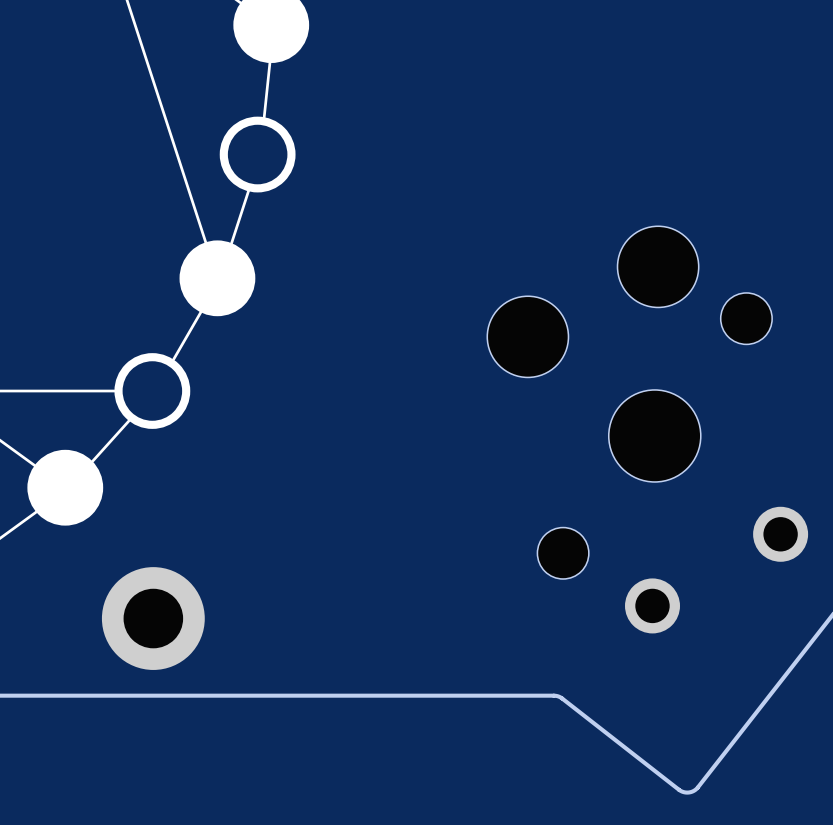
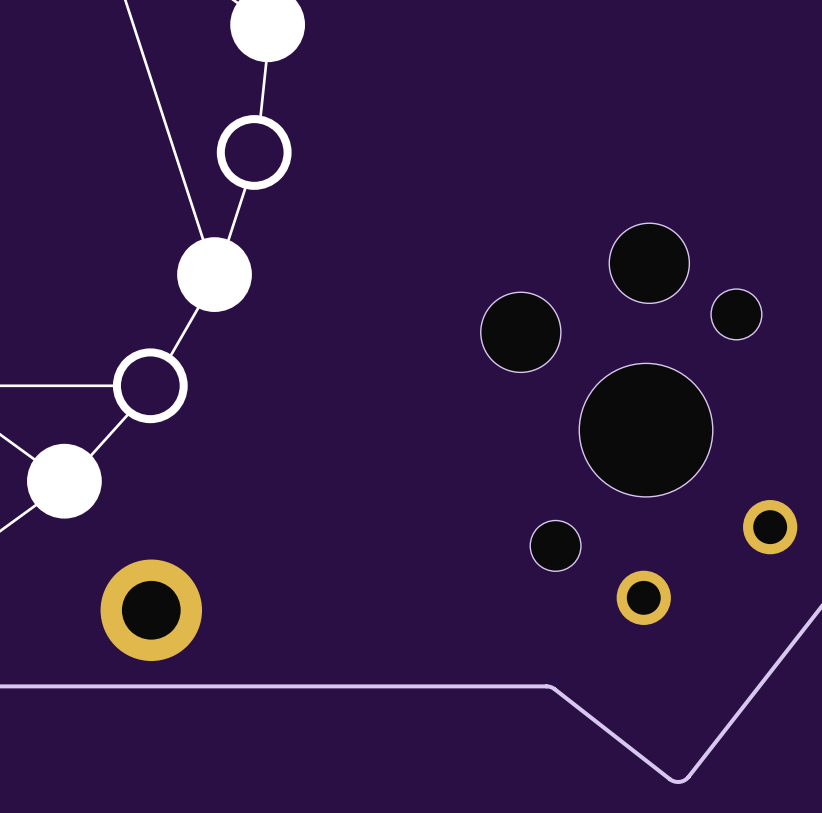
part footprint: [487, 226, 809, 634] -> [480, 223, 798, 625]

